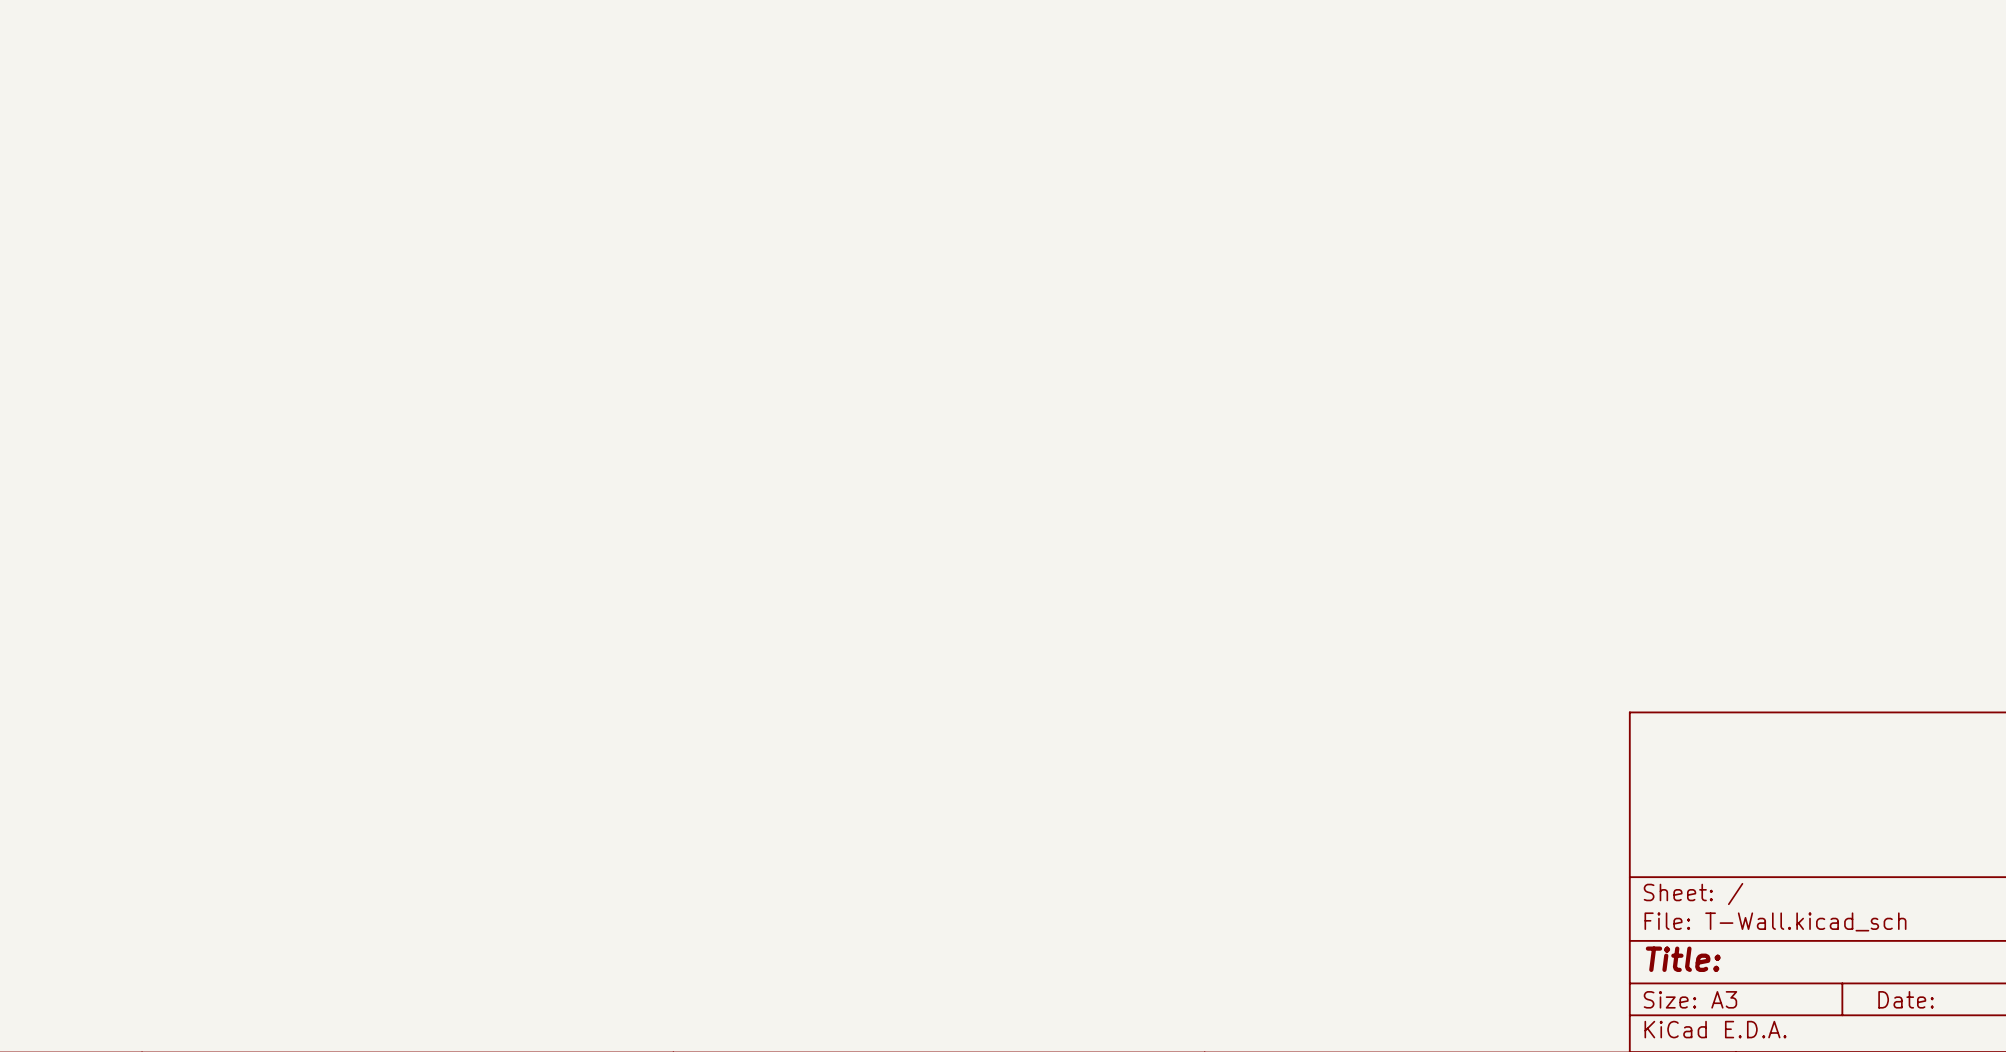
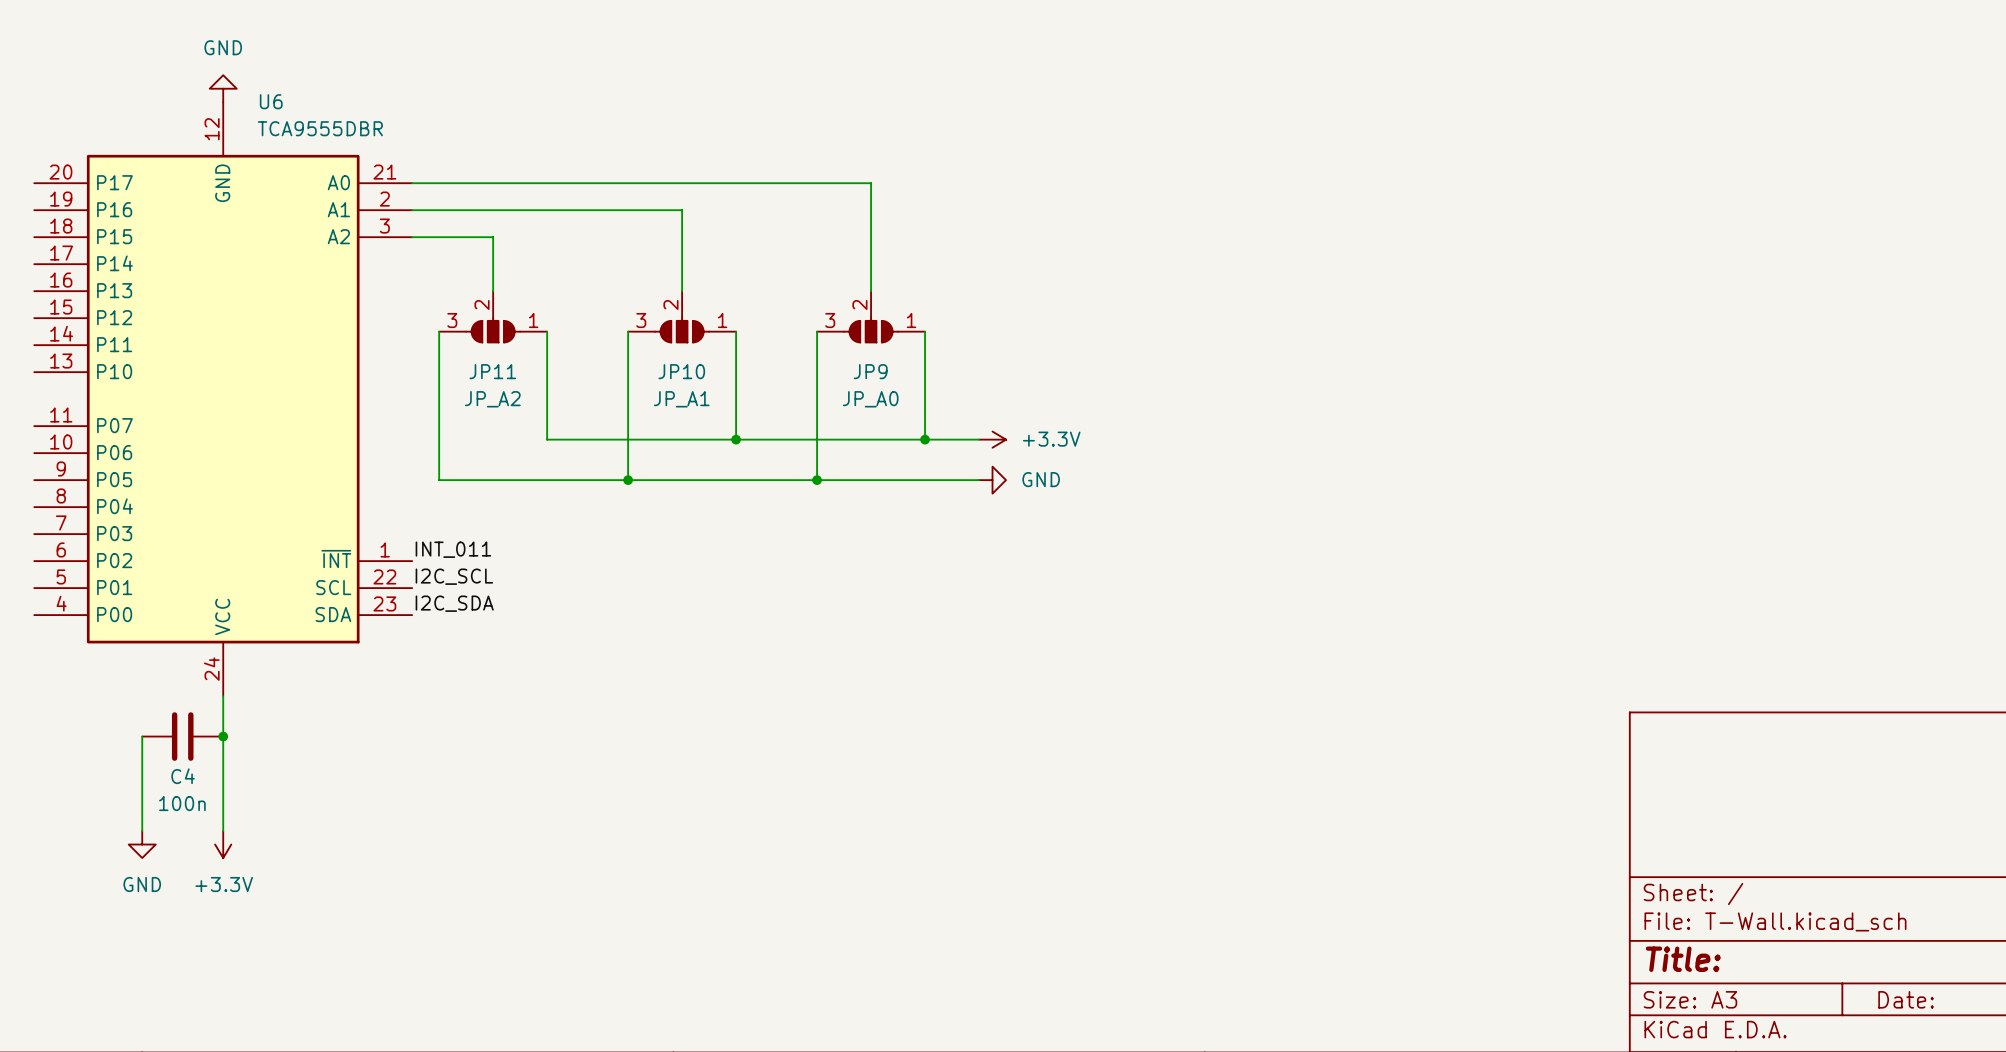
power symbol: none -> GND (223, 88)
wire: none -> (412, 183) (871, 183) (871, 291)
wire: none -> (412, 210) (682, 210) (682, 291)
wire: none -> (412, 237) (493, 237) (493, 291)
JP11: none -> JP_A2 (493, 316)
JP10: none -> JP_A1 (682, 316)
JP9: none -> JP_A0 (871, 316)
wire: none -> (439, 331) (439, 480) (979, 480)
wire: none -> (547, 331) (547, 439) (979, 439)
wire: none -> (628, 331) (628, 480)
wire: none -> (736, 331) (736, 439)
wire: none -> (817, 331) (817, 480)
wire: none -> (925, 331) (925, 439)
U6: none -> TCA9555DBR (223, 399)
junction: none -> (736, 439)
junction: none -> (925, 439)
power symbol: none -> +3.3V (992, 439)
junction: none -> (628, 480)
junction: none -> (817, 480)
power symbol: none -> GND (992, 480)
label: none -> INT_011 (453, 549)
label: none -> I2C_SCL (454, 576)
label: none -> I2C_SDA (454, 603)
wire: none -> (223, 696) (223, 831)
wire: none -> (142, 736) (142, 831)
C4: none -> 100n (182, 736)
junction: none -> (223, 736)
power symbol: none -> GND (142, 844)
power symbol: none -> +3.3V (223, 844)

